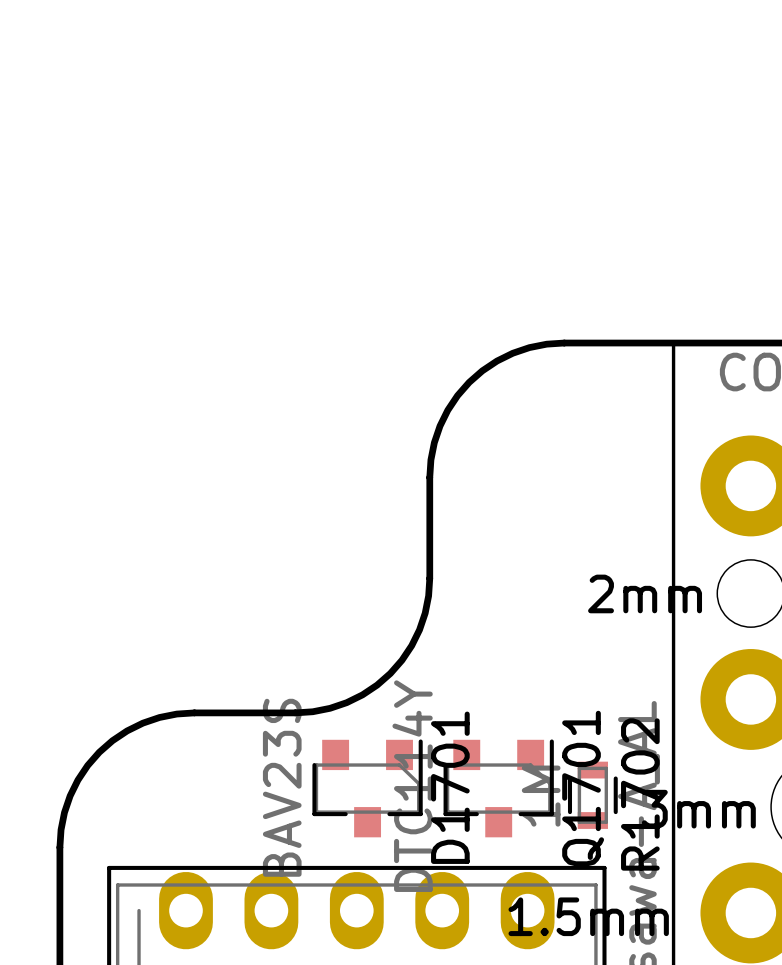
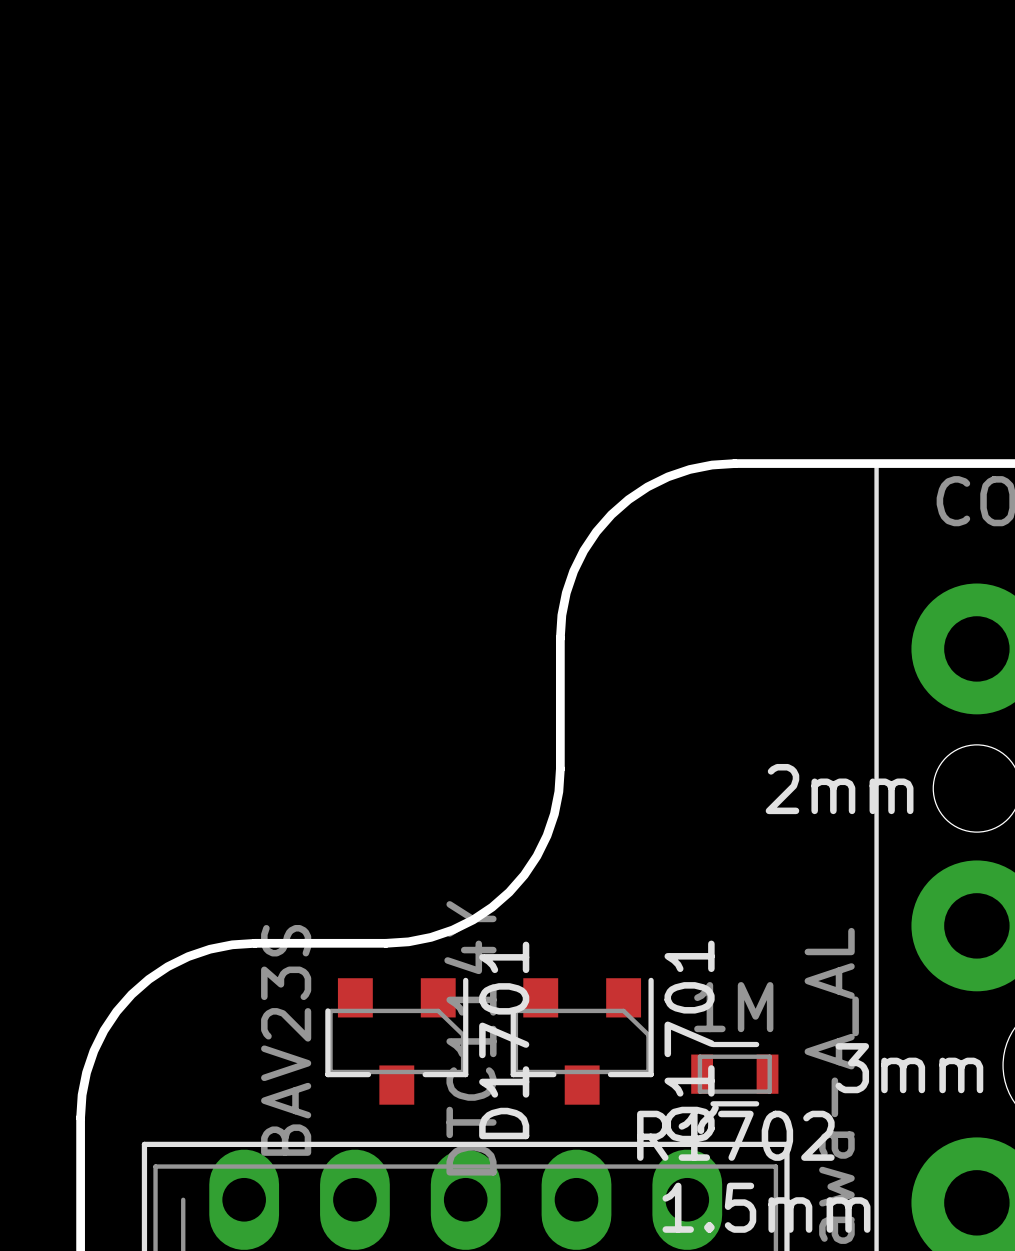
D1701 position: (367, 788) -> (396, 1041)
Q1701 position: (498, 788) -> (582, 1041)
R1702 rotation: 0° (592, 795) -> 90° clockwise (734, 1074)

